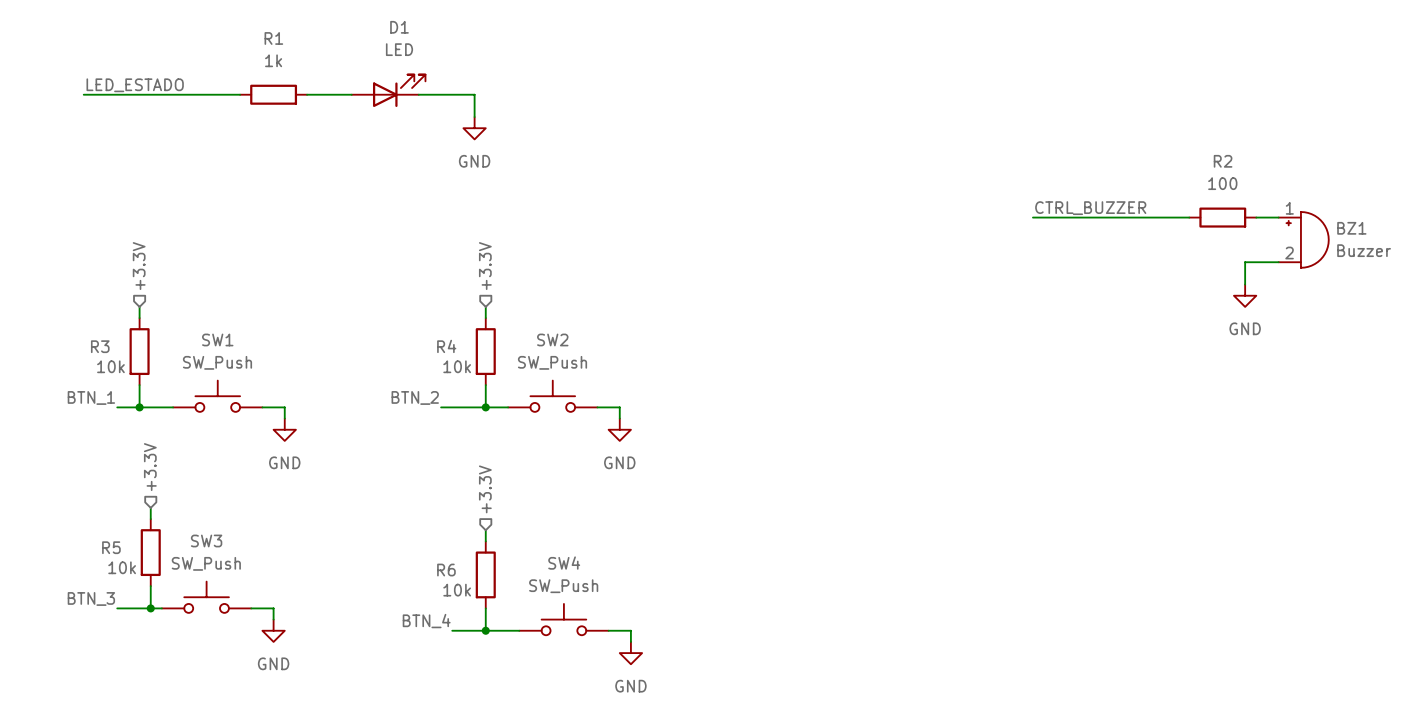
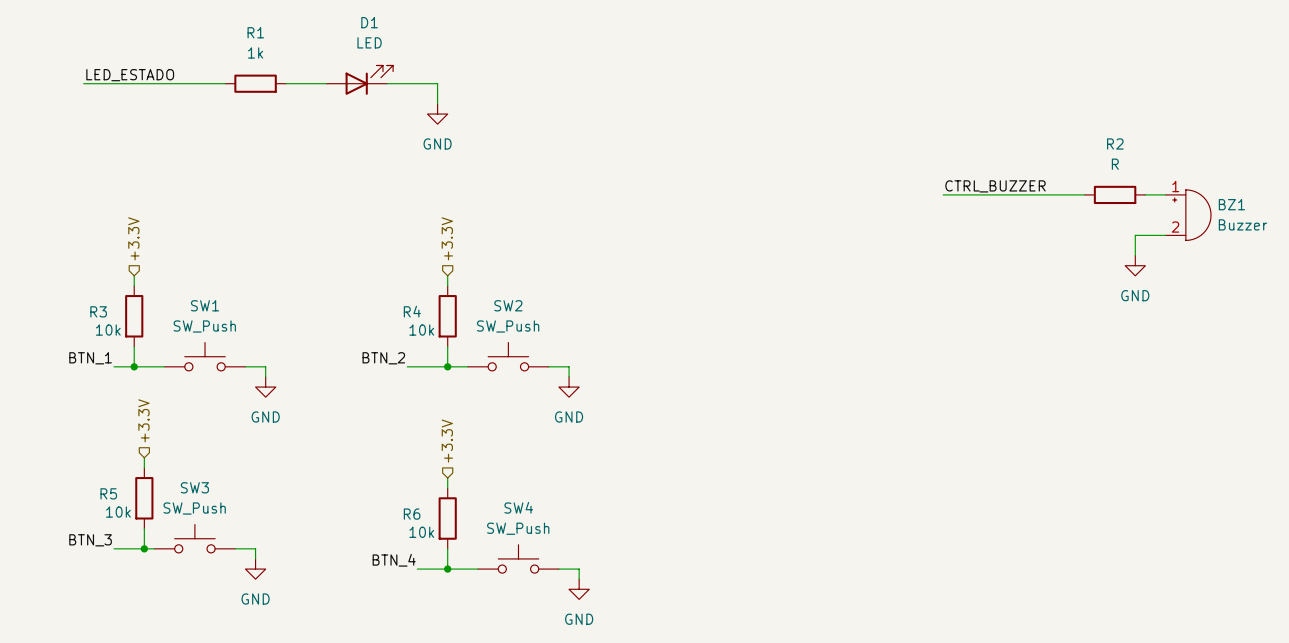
R2 value: 100 (1222, 183) -> R (1115, 164)

